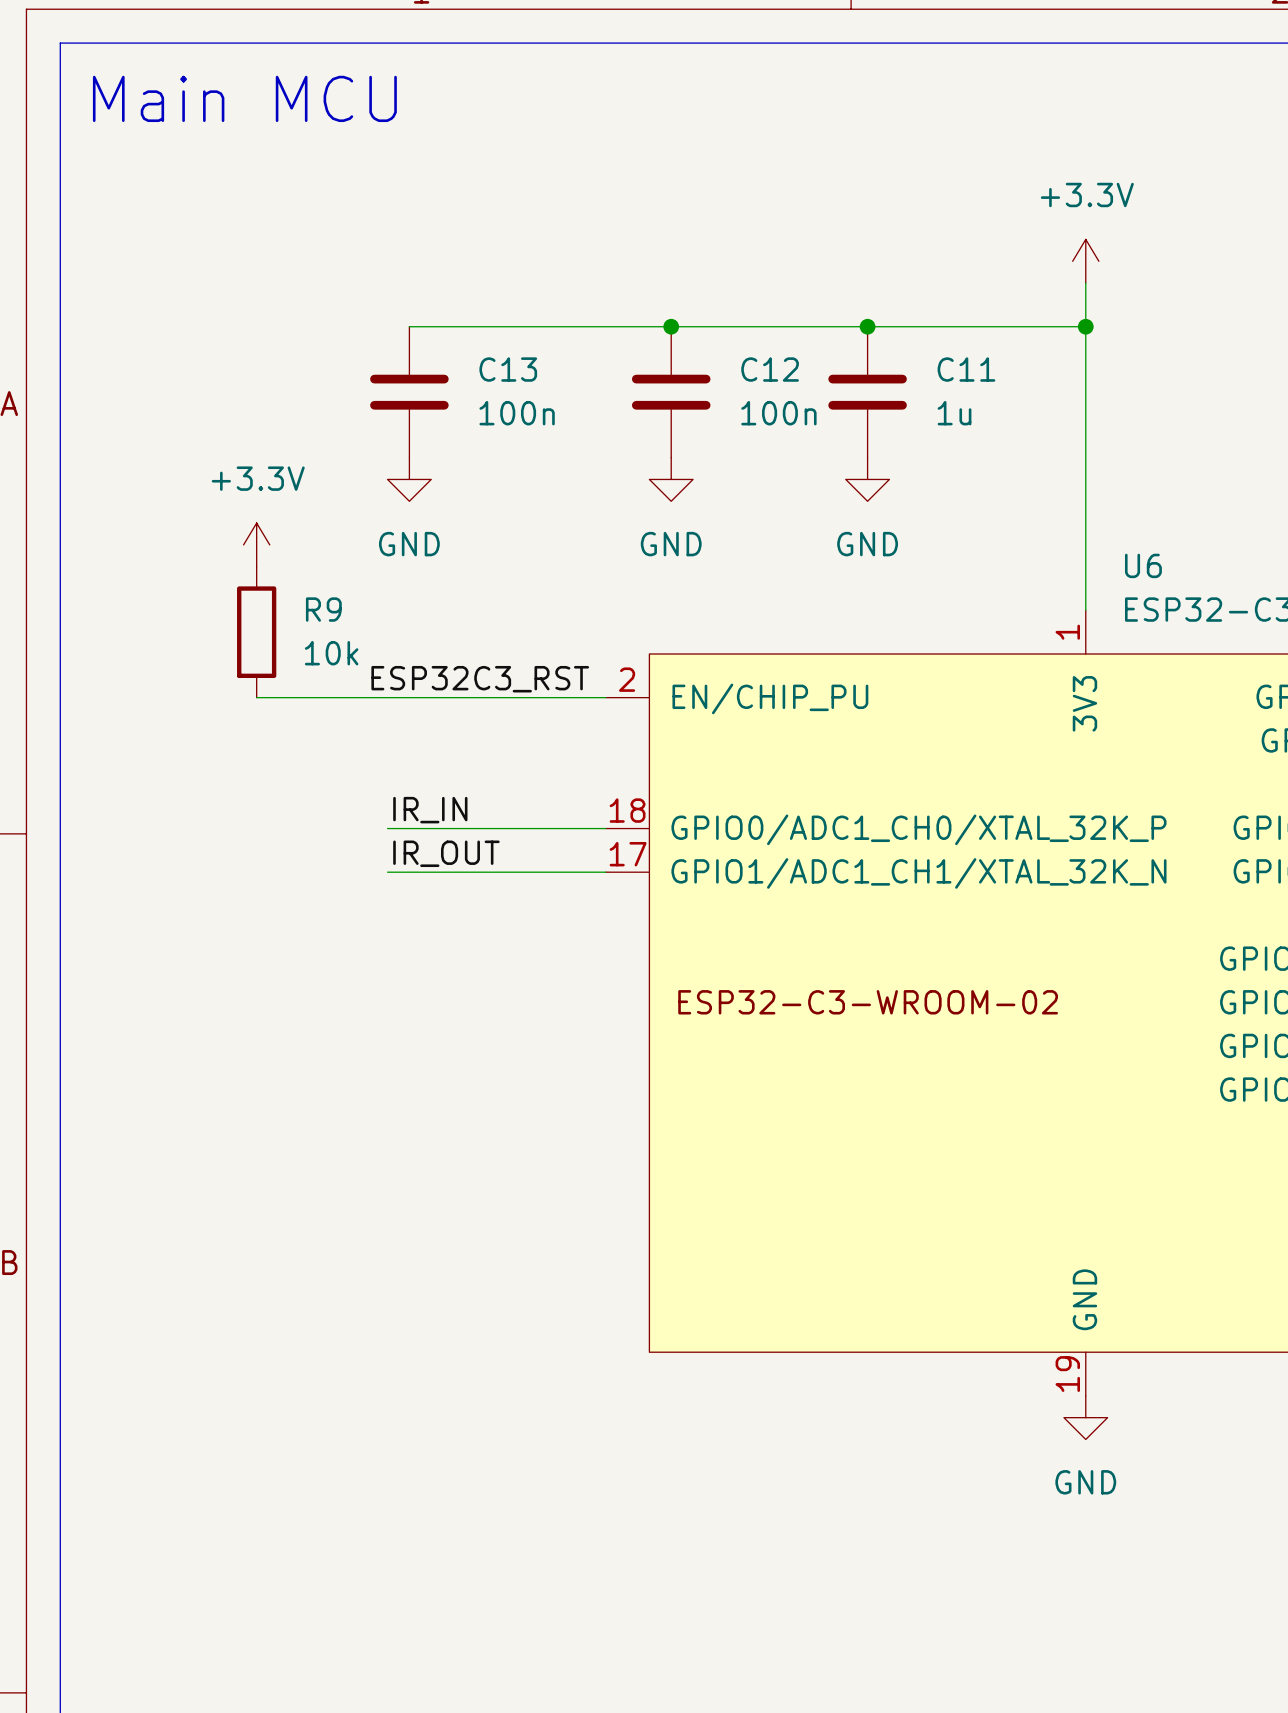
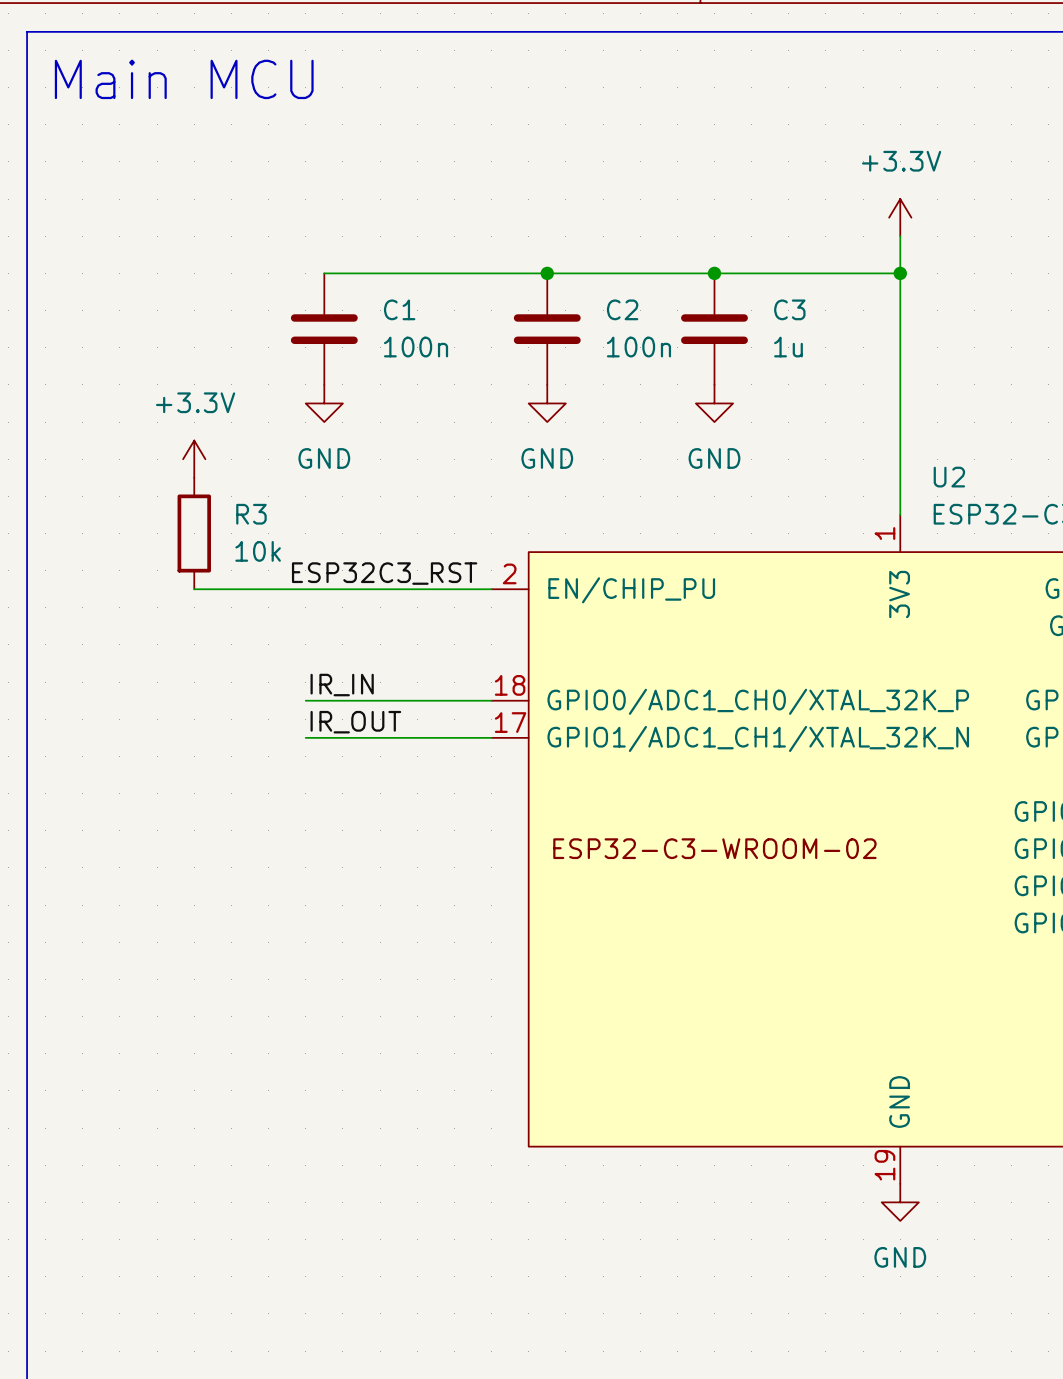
C13 name: C13 (508, 369) -> C1 (399, 309)
C12 name: C12 (770, 369) -> C2 (622, 309)
C11 name: C11 (966, 369) -> C3 (789, 309)
U6 name: U6 (1143, 565) -> U2 (949, 477)
R9 name: R9 (323, 609) -> R3 (251, 514)

